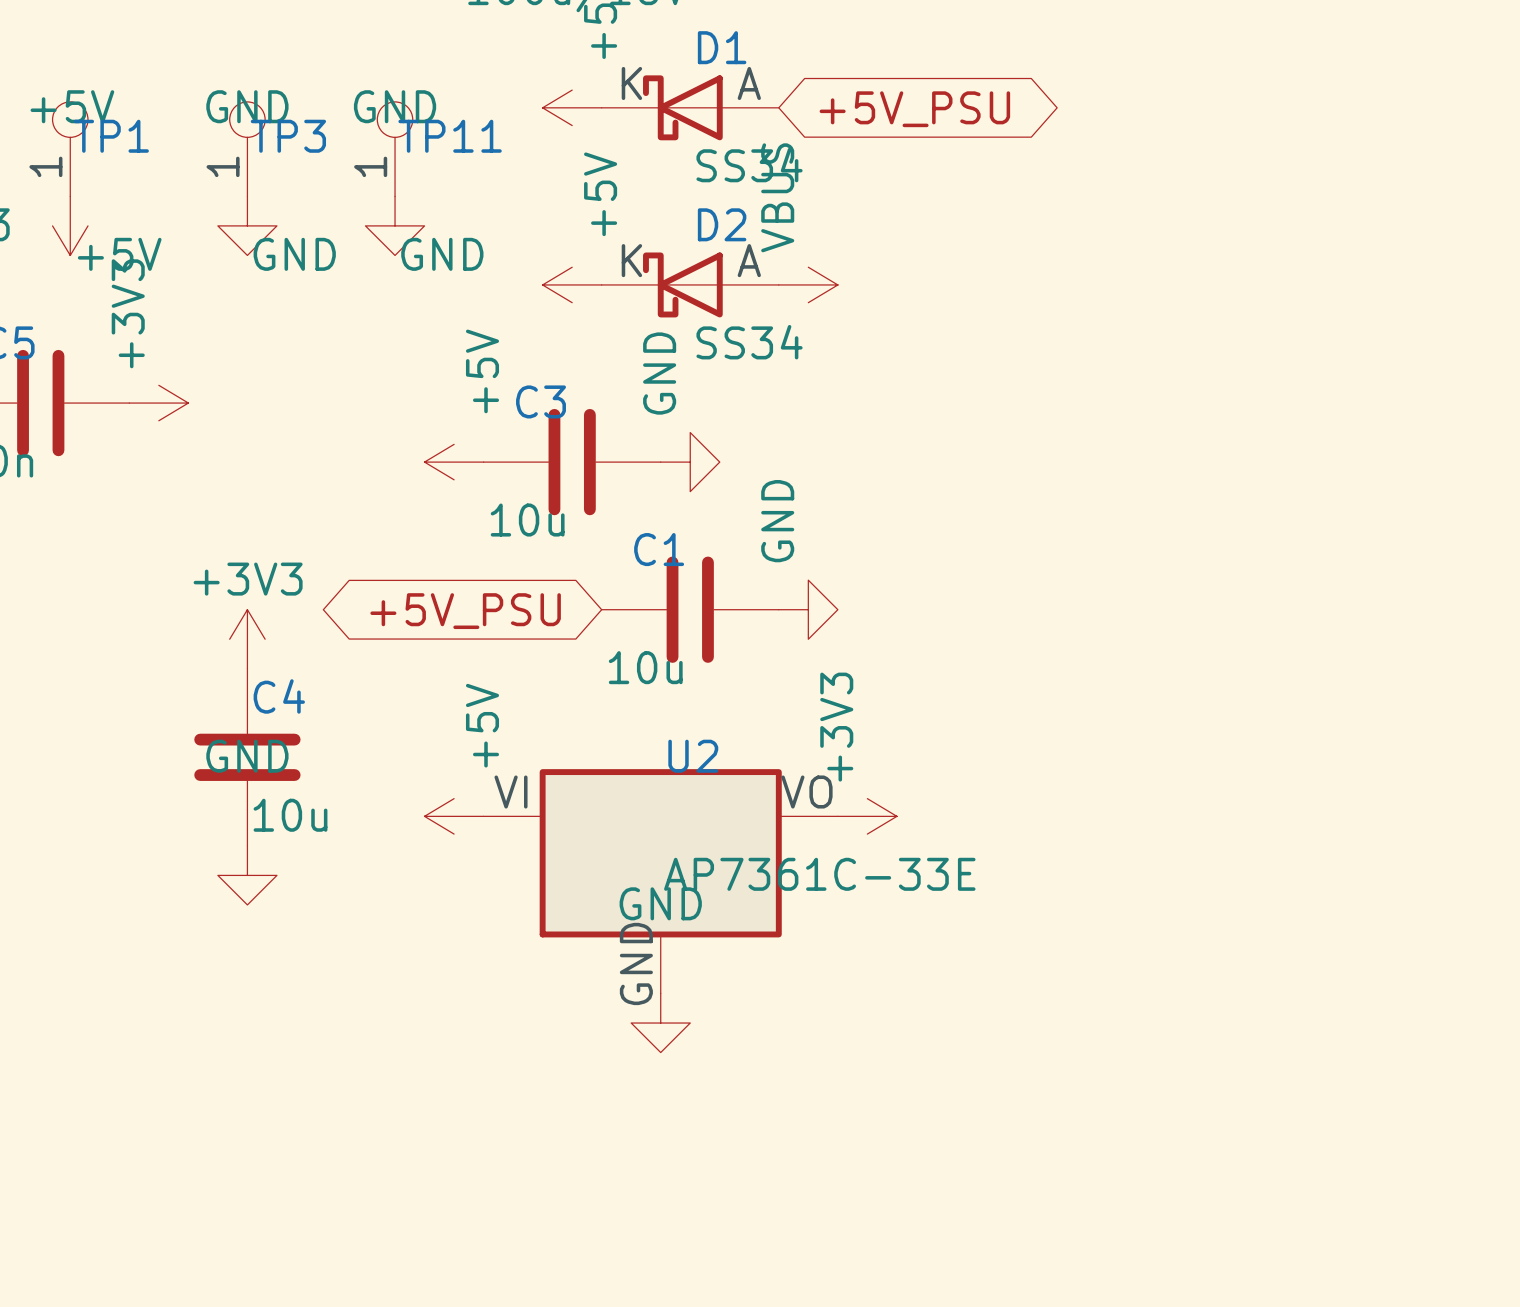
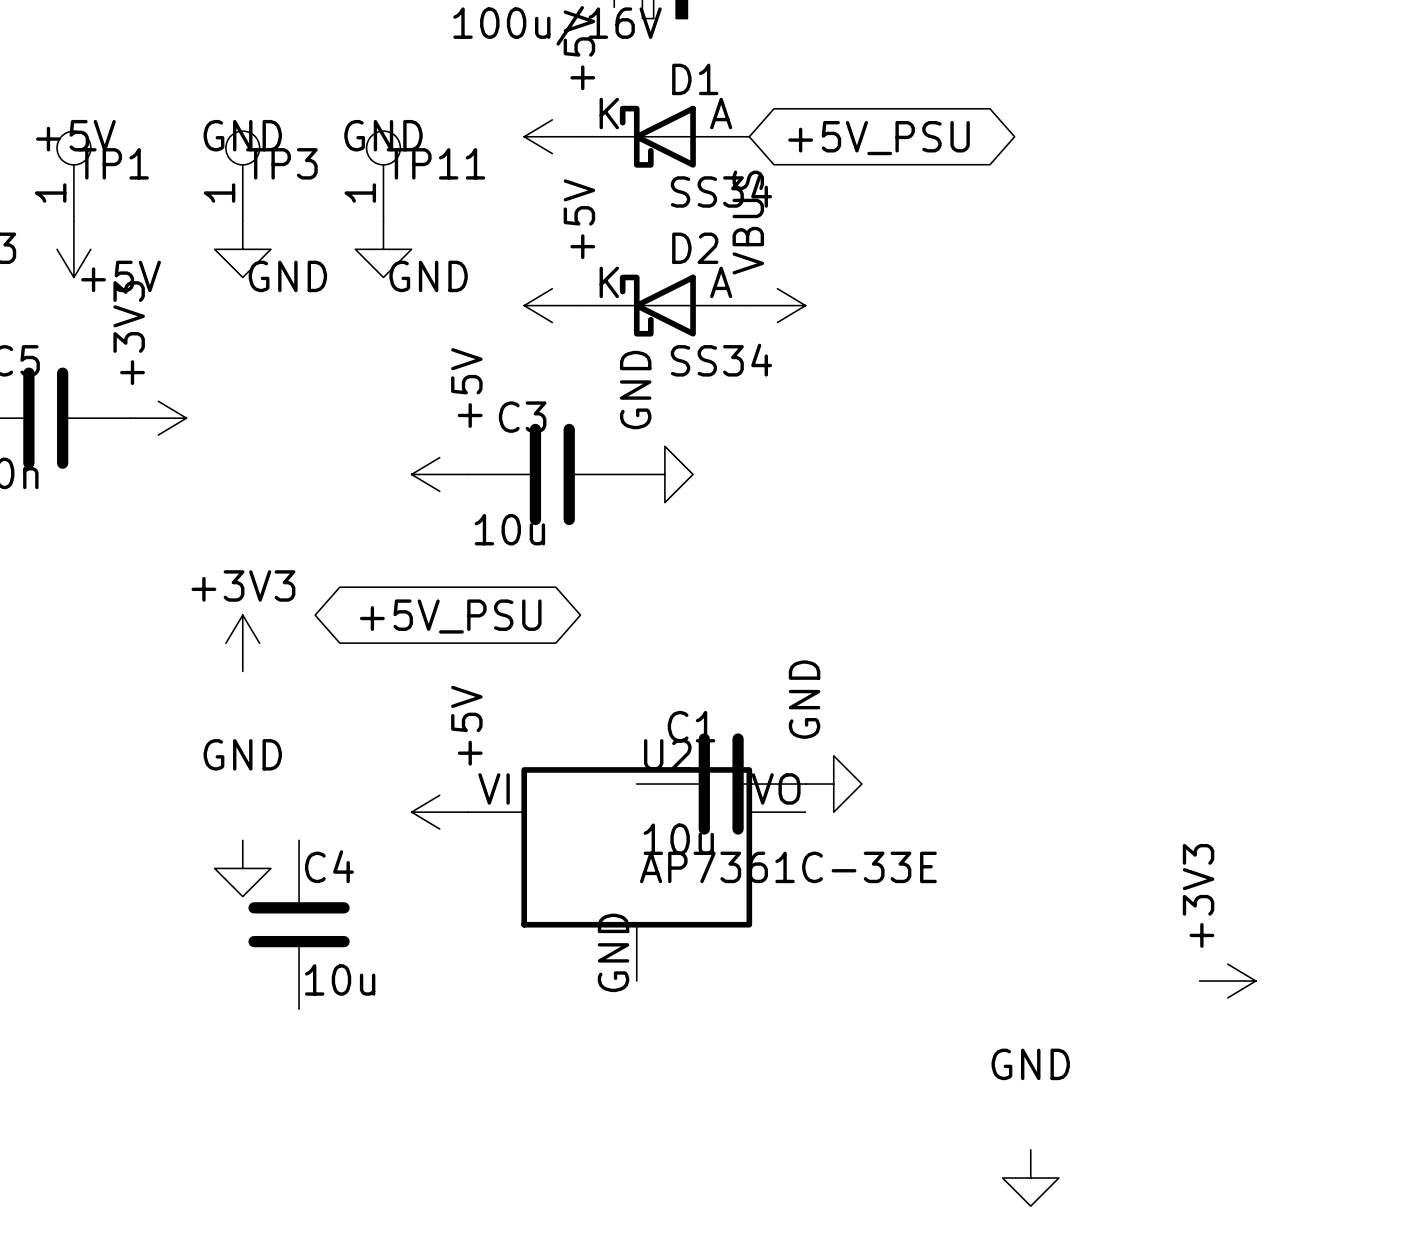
C1 position: (690, 609) -> (721, 784)
power symbol: GND (808, 609) -> none
C4 position: (247, 757) -> (299, 924)
power symbol: none -> GND (833, 784)
power symbol position: +3V3 (867, 816) -> +3V3 (1227, 981)
power symbol: GND (660, 1023) -> none
power symbol: none -> GND (1030, 1178)

